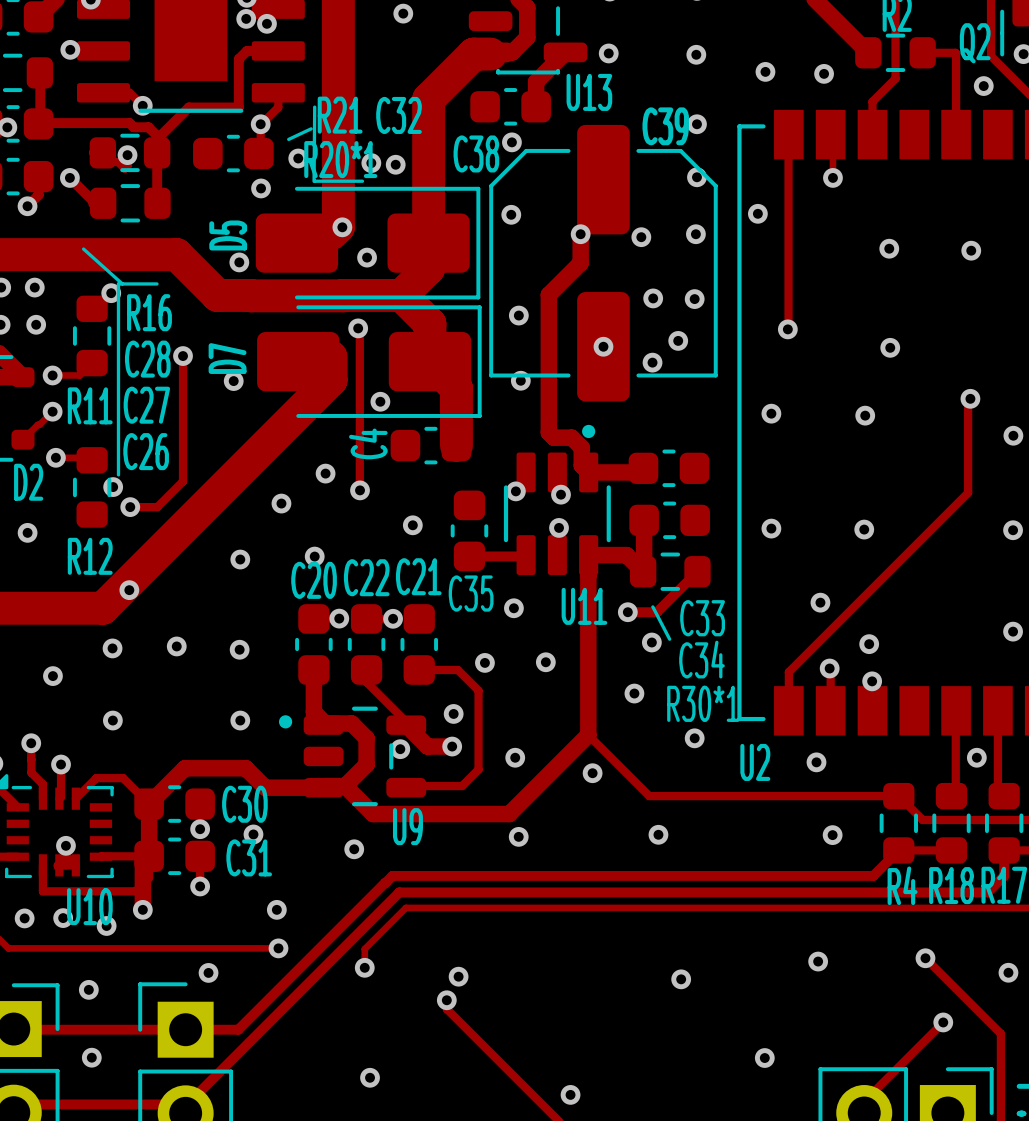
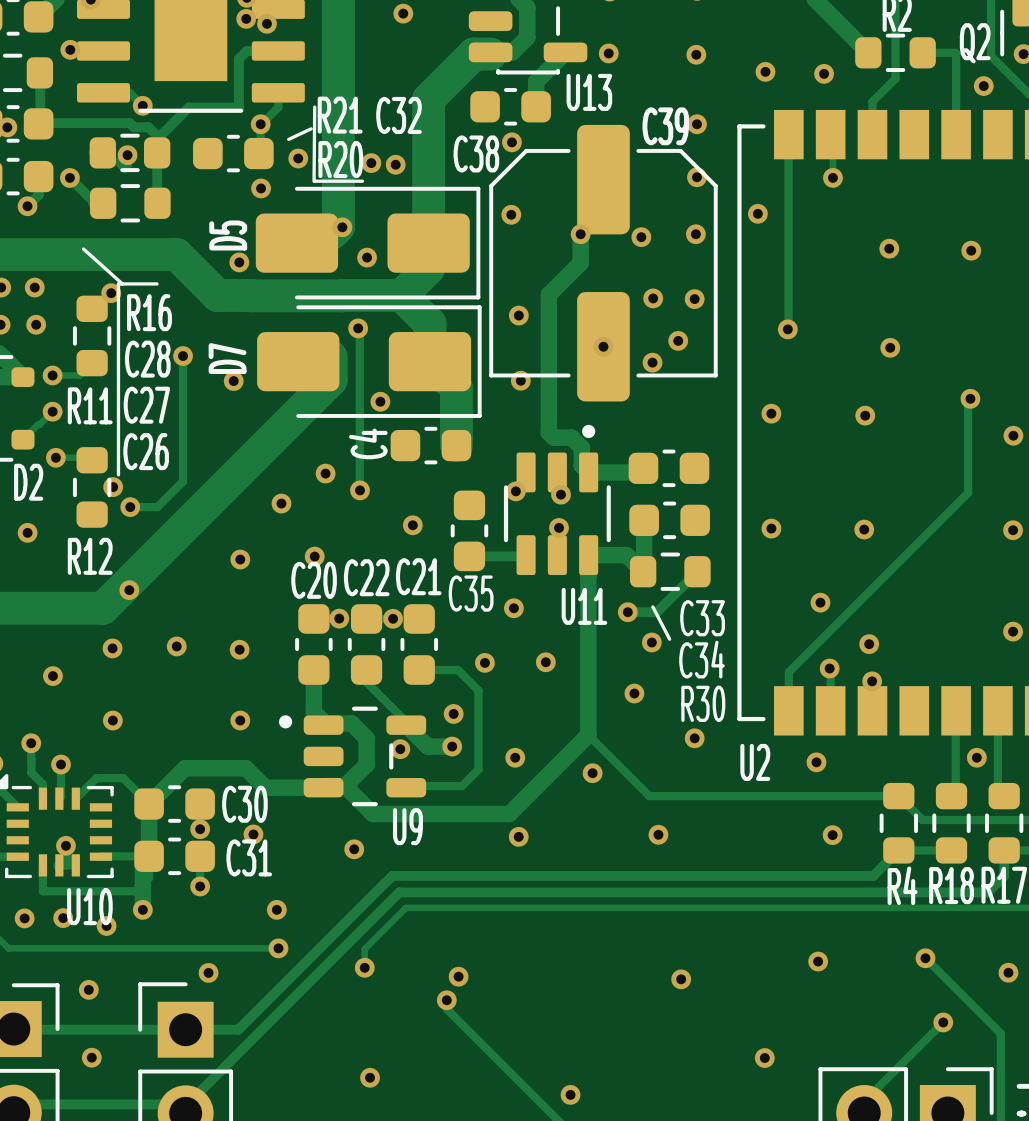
R20*1 name: R20*1 (340, 159) -> R20 (340, 159)
R30*1 name: R30*1 (703, 703) -> R30 (703, 703)

